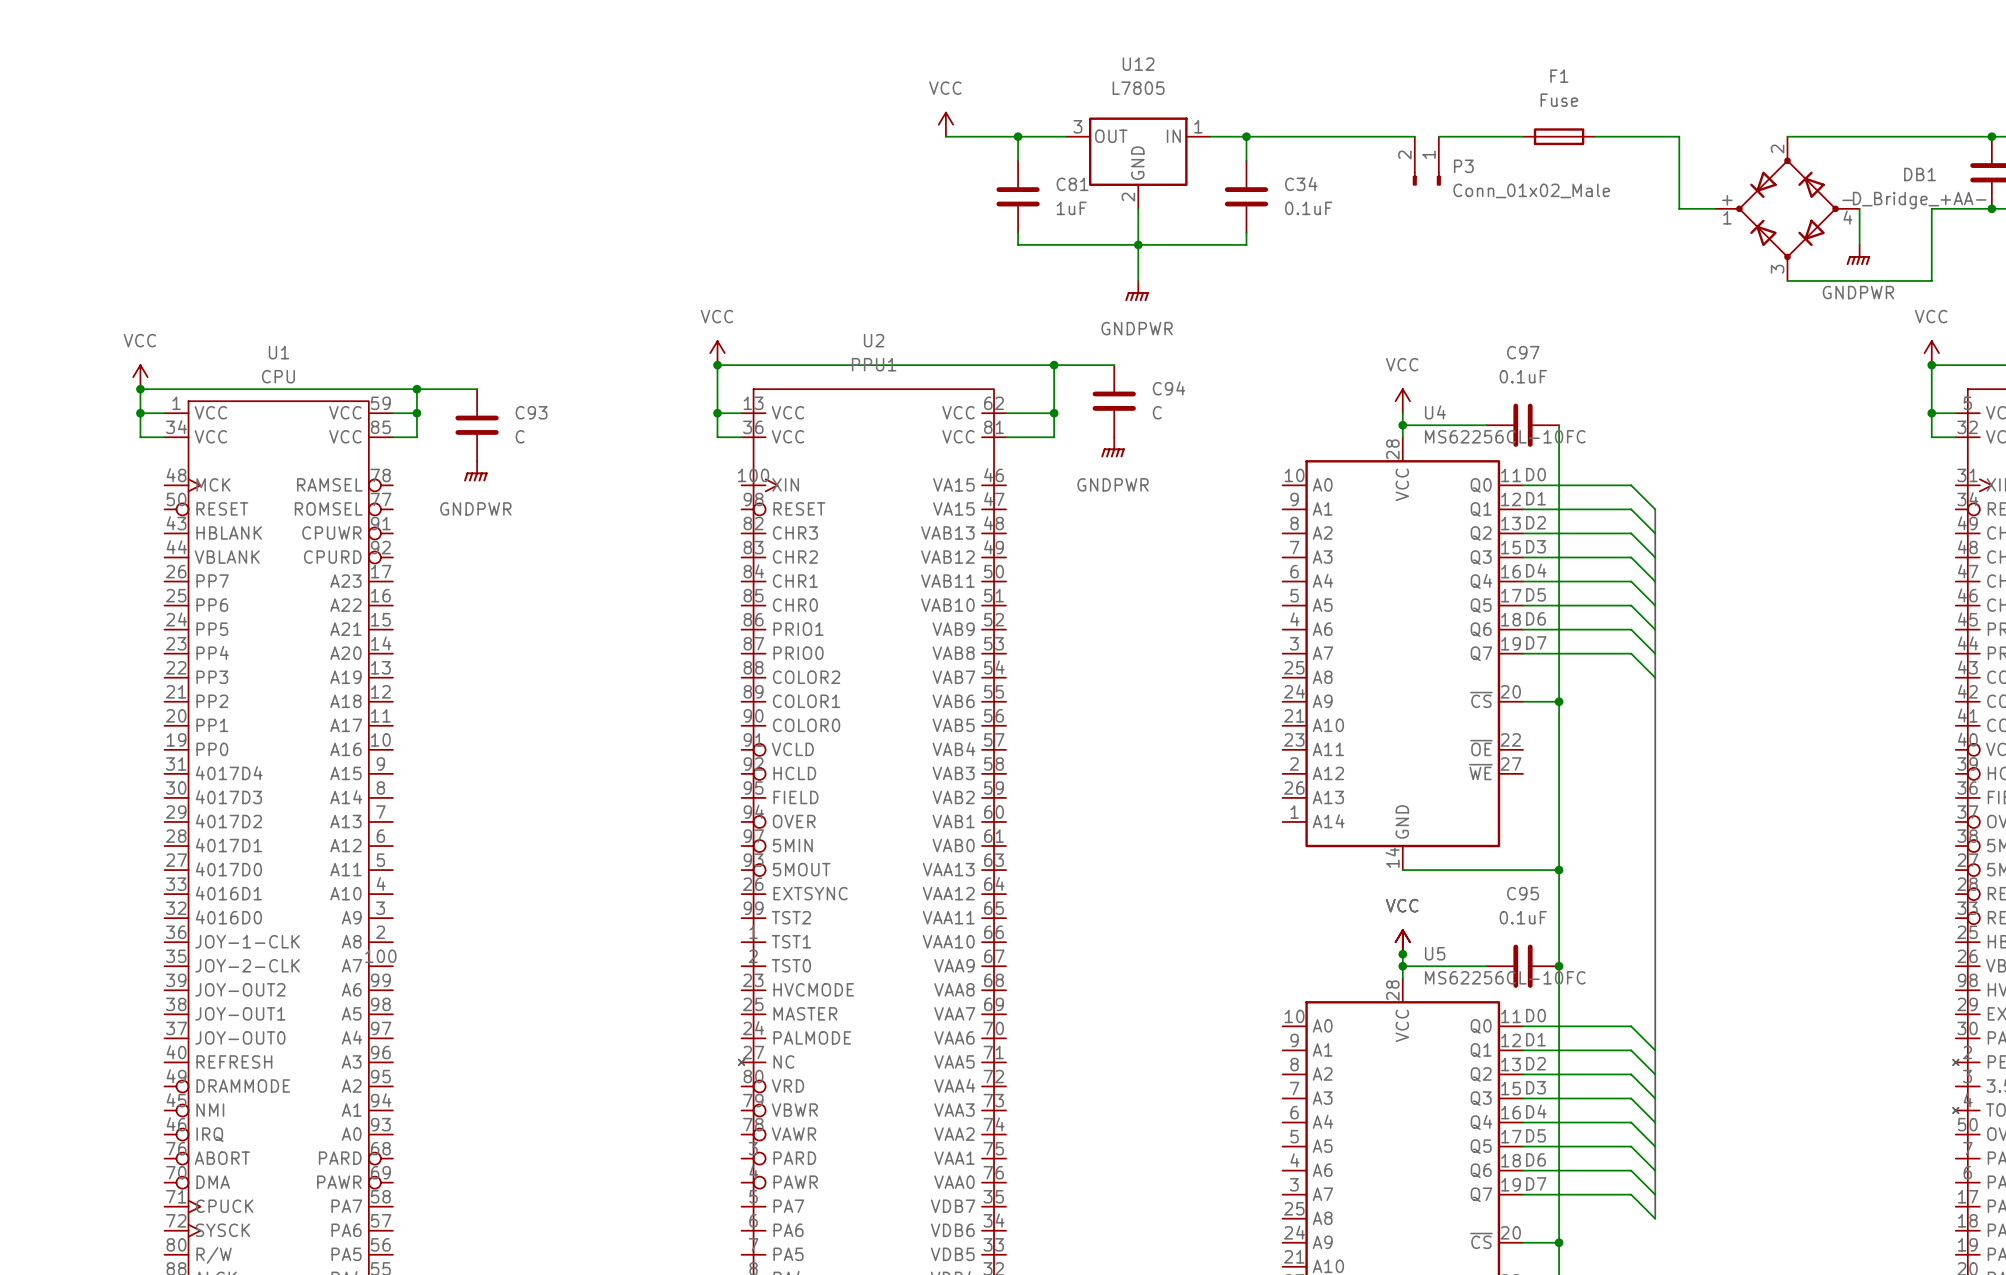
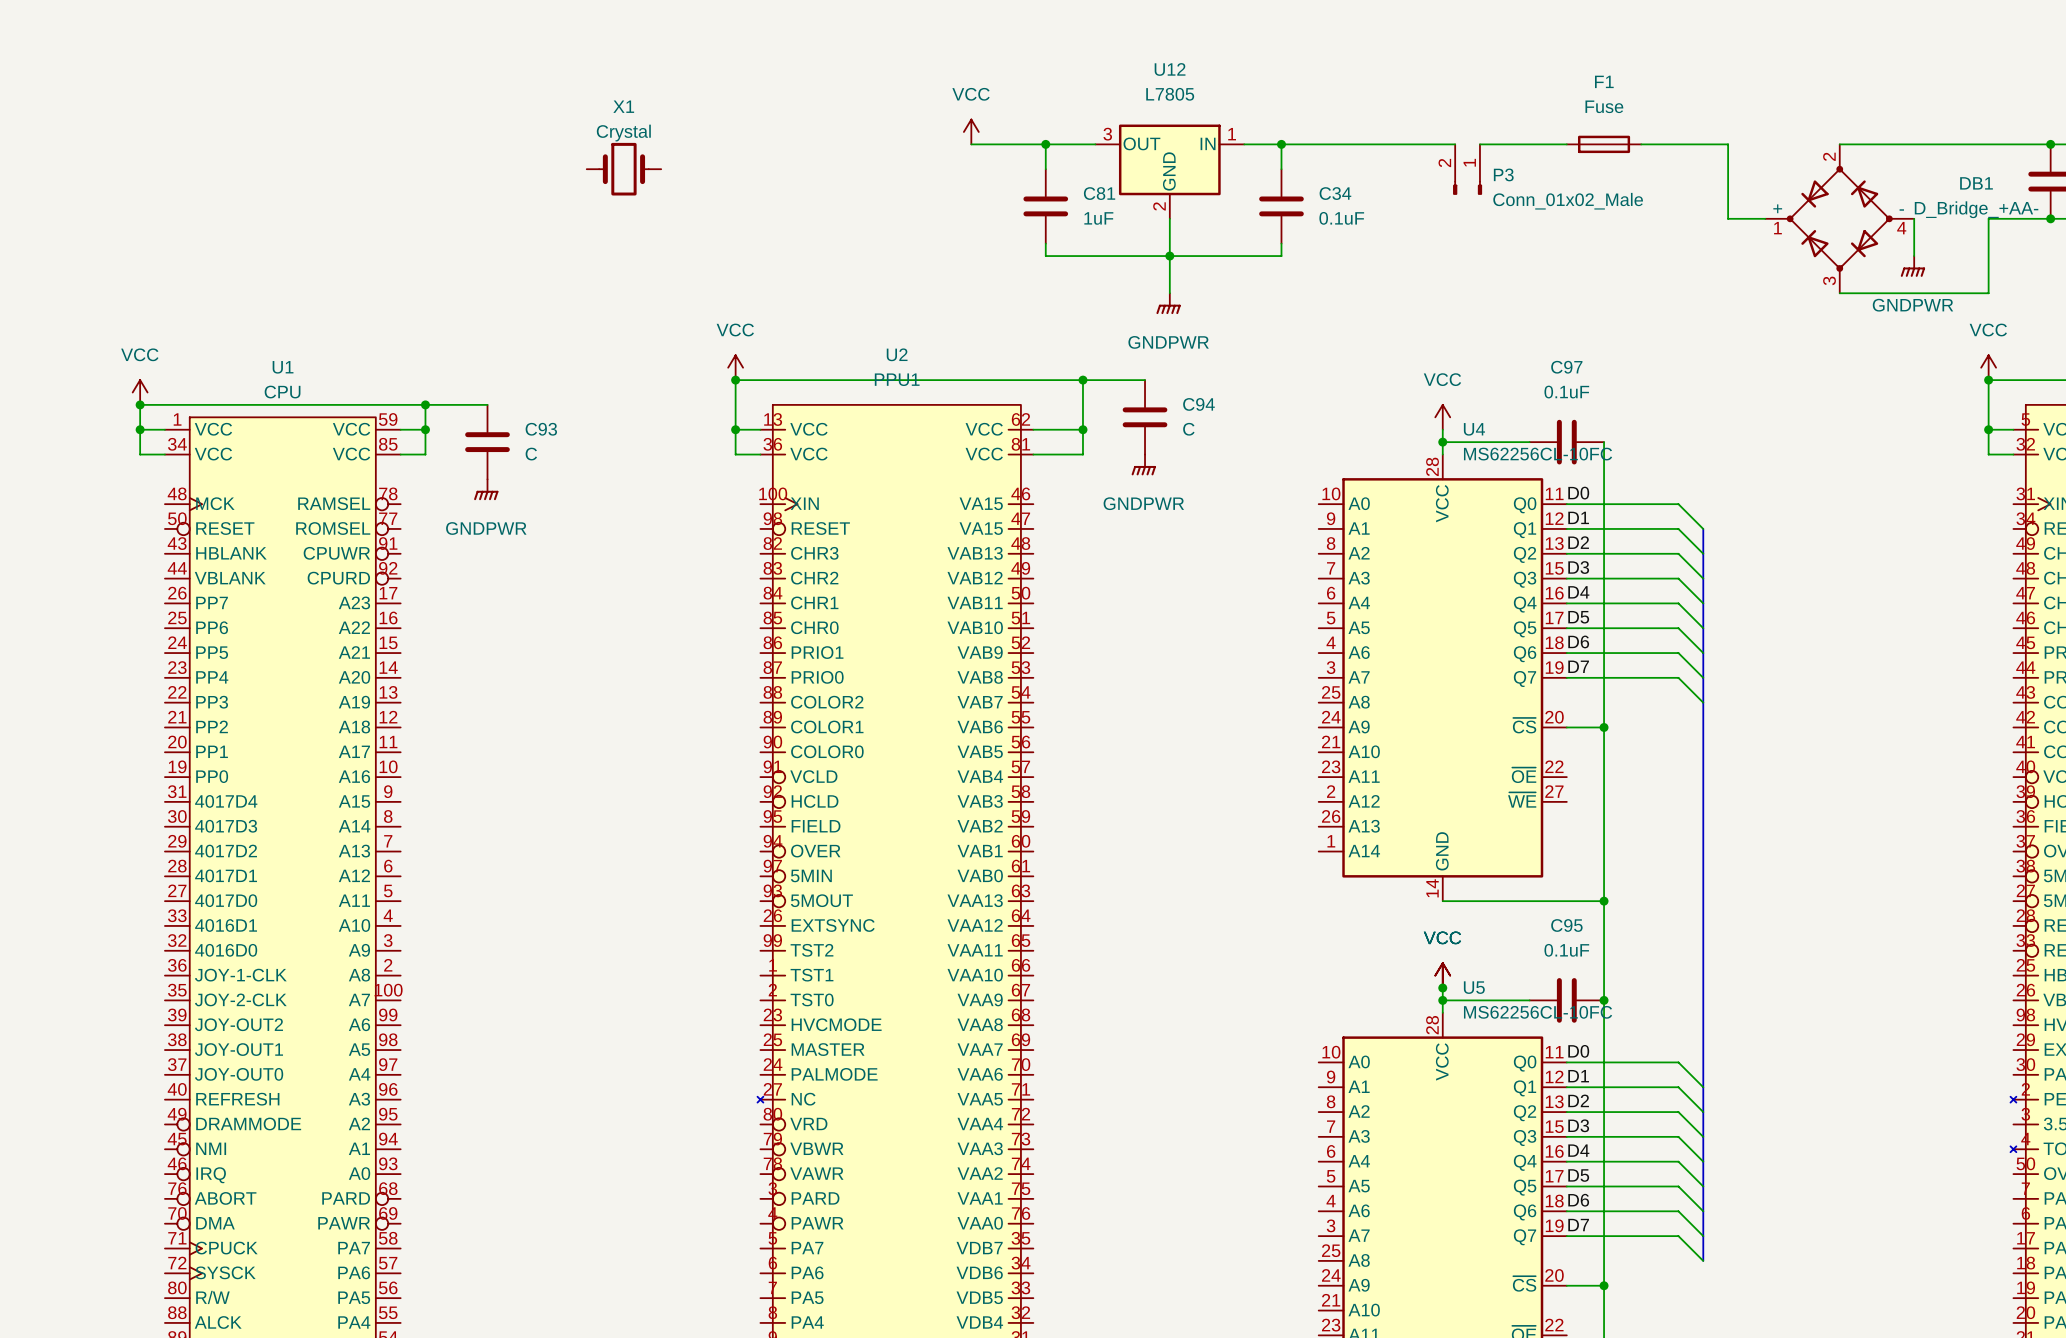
X1: none -> Crystal (623, 169)

